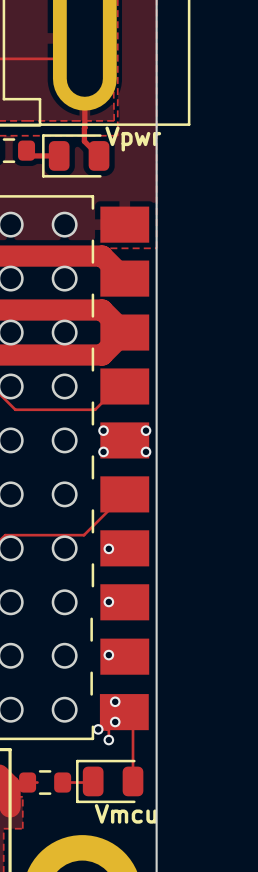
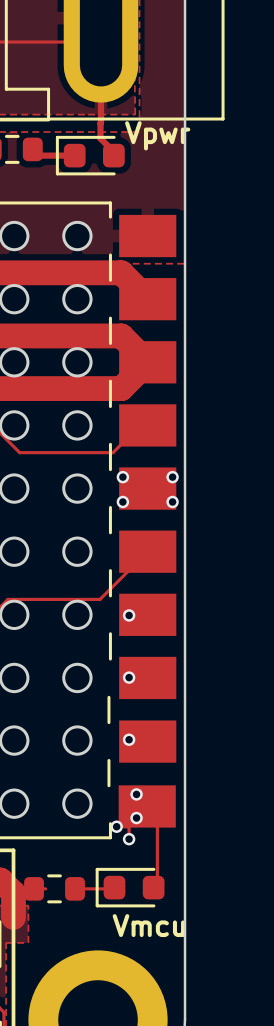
part footprint: [42, 134, 110, 178] -> [55, 135, 125, 176]
part footprint: [76, 759, 144, 804] -> [95, 867, 165, 908]

